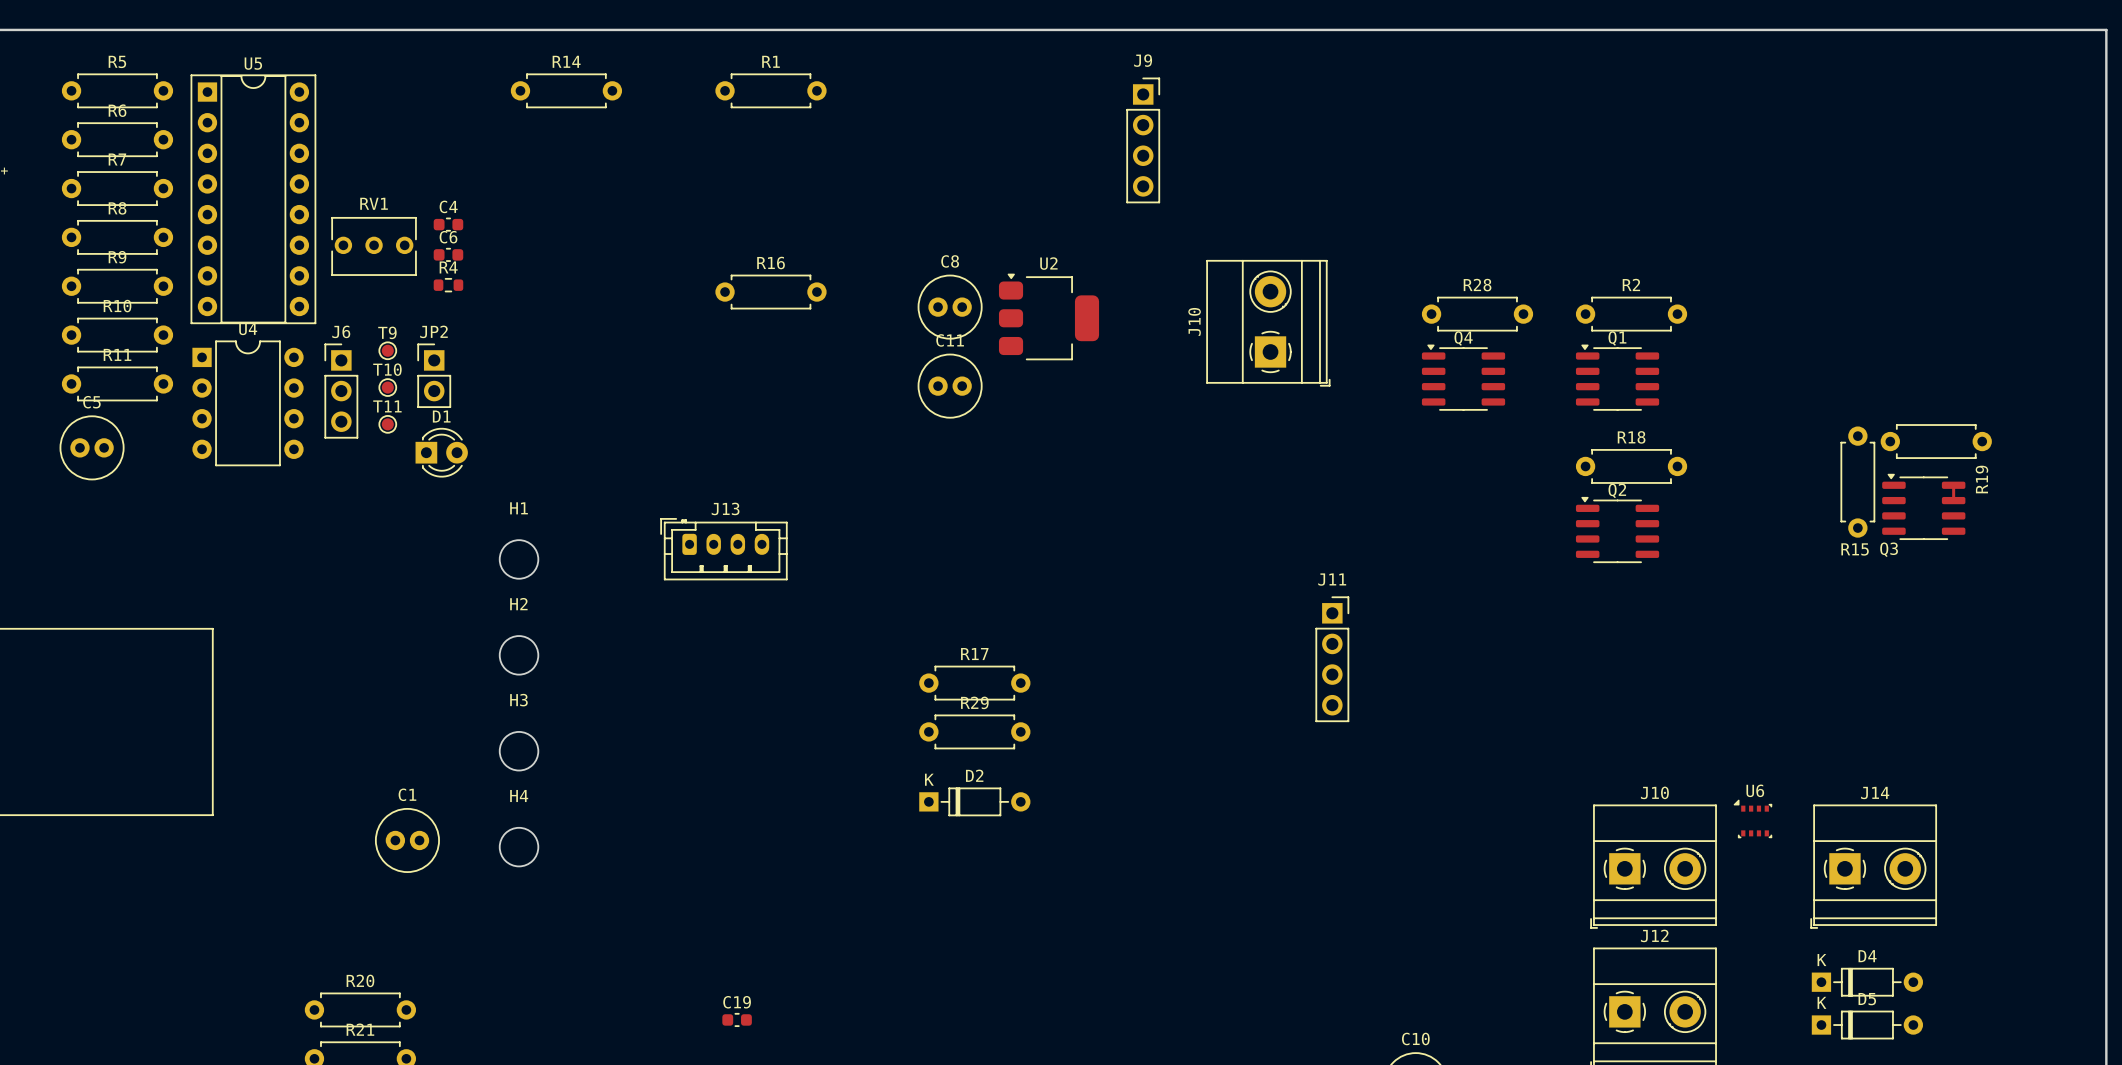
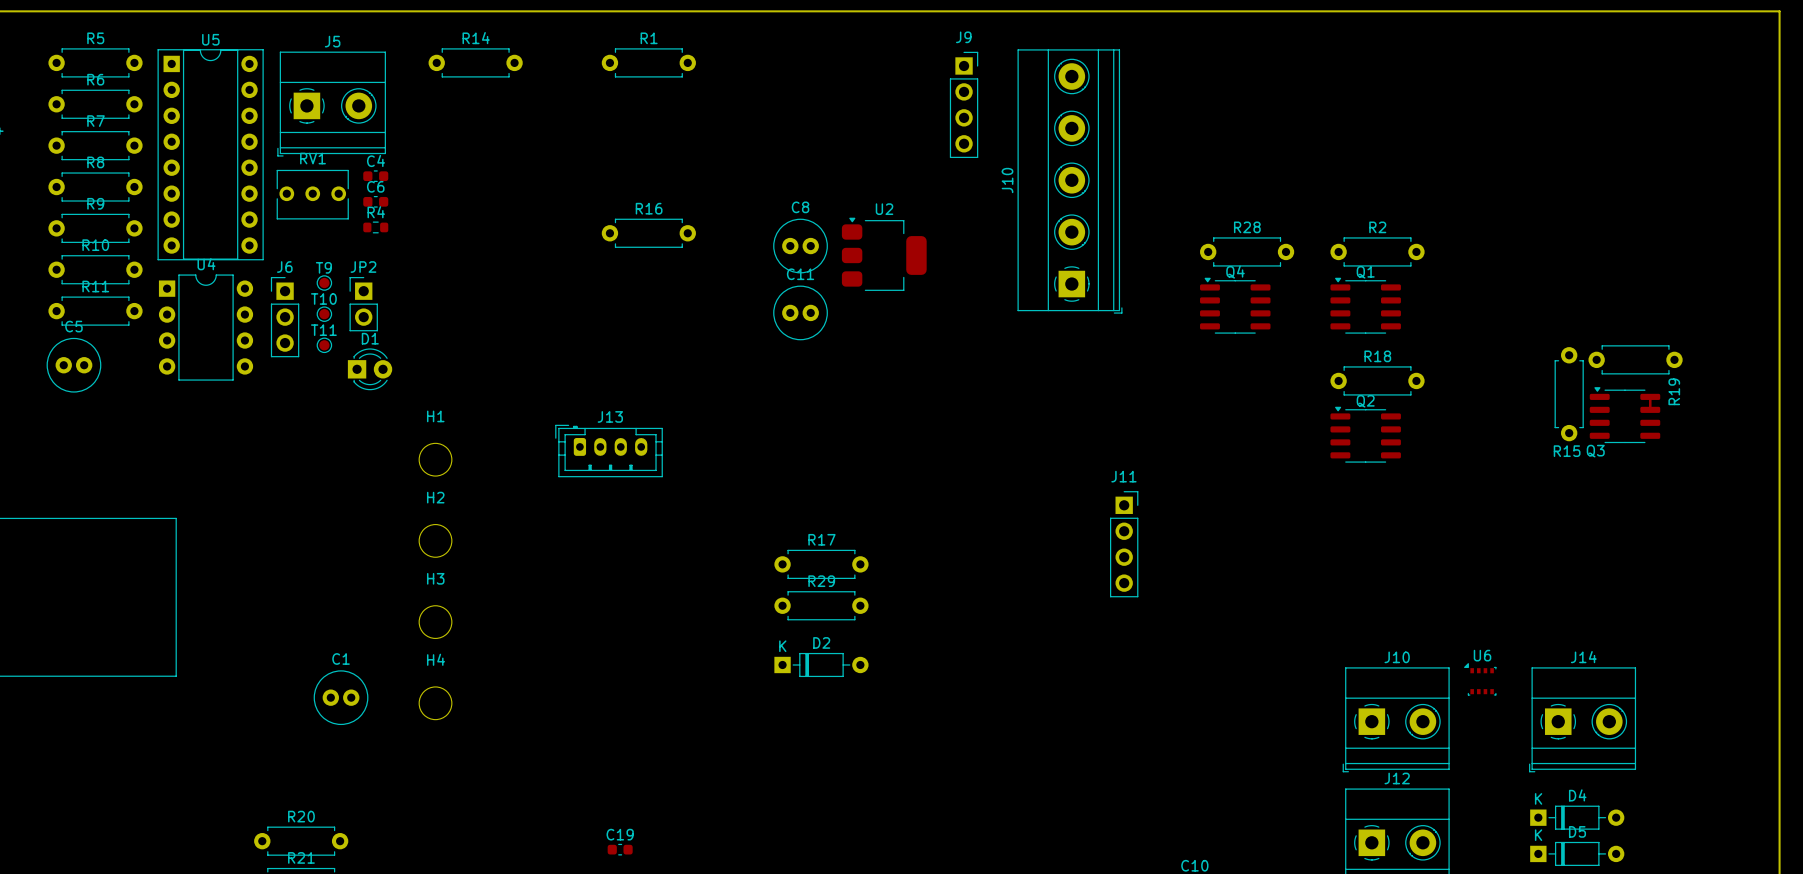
J5: none -> (331, 104)
J10: none -> (1070, 181)
J10: (1268, 323) -> none

